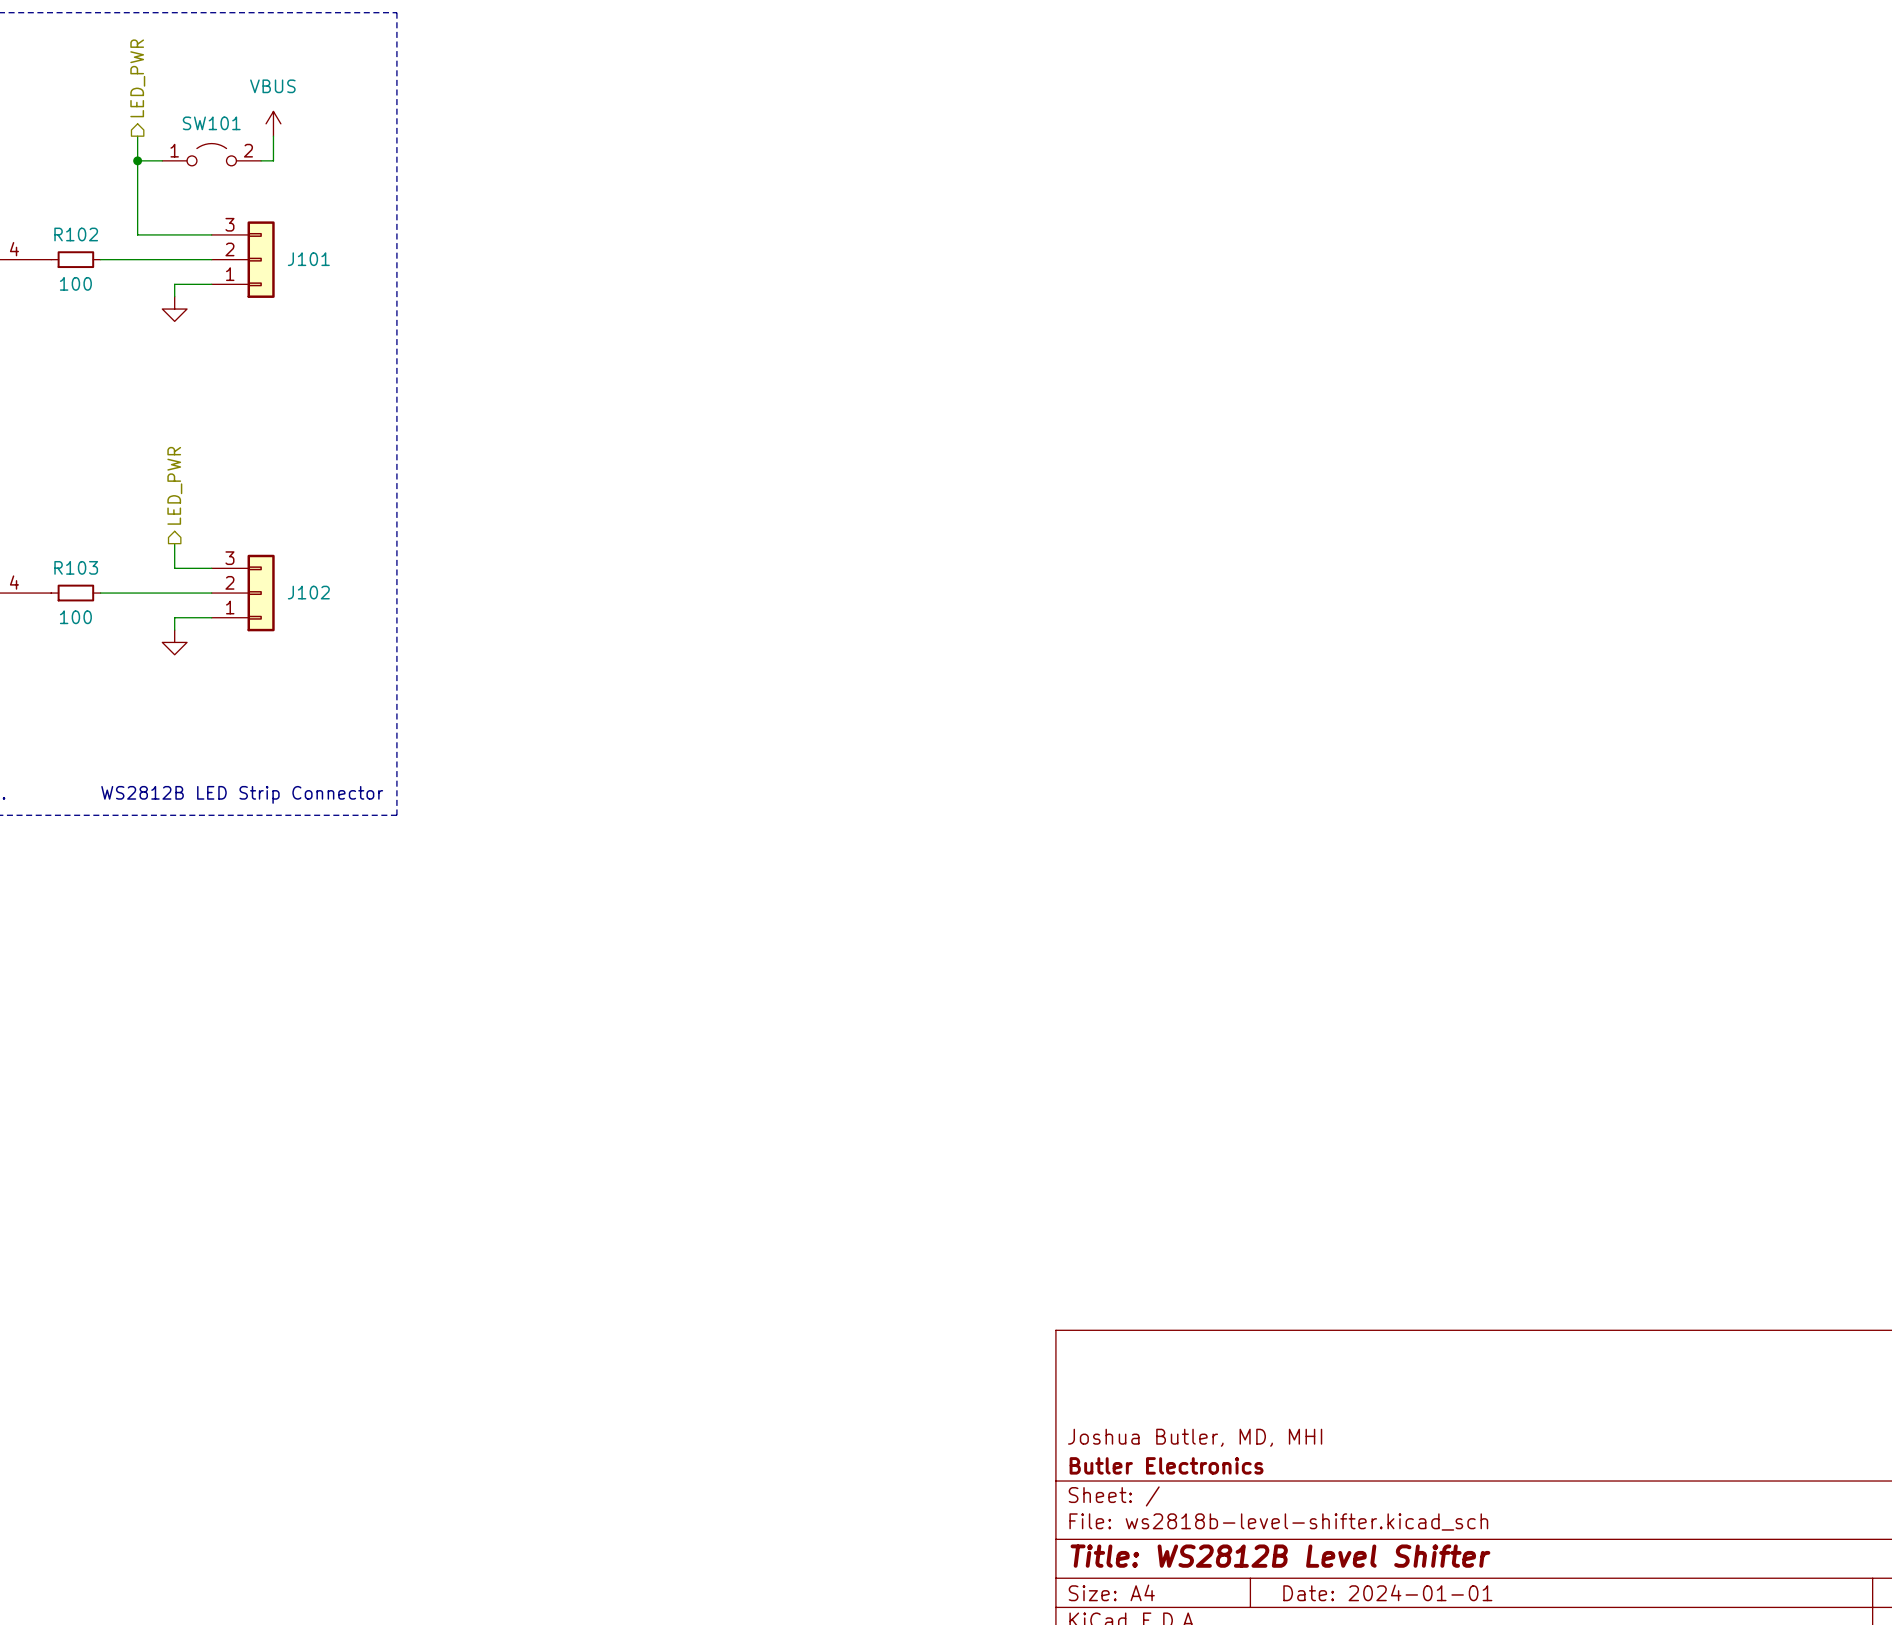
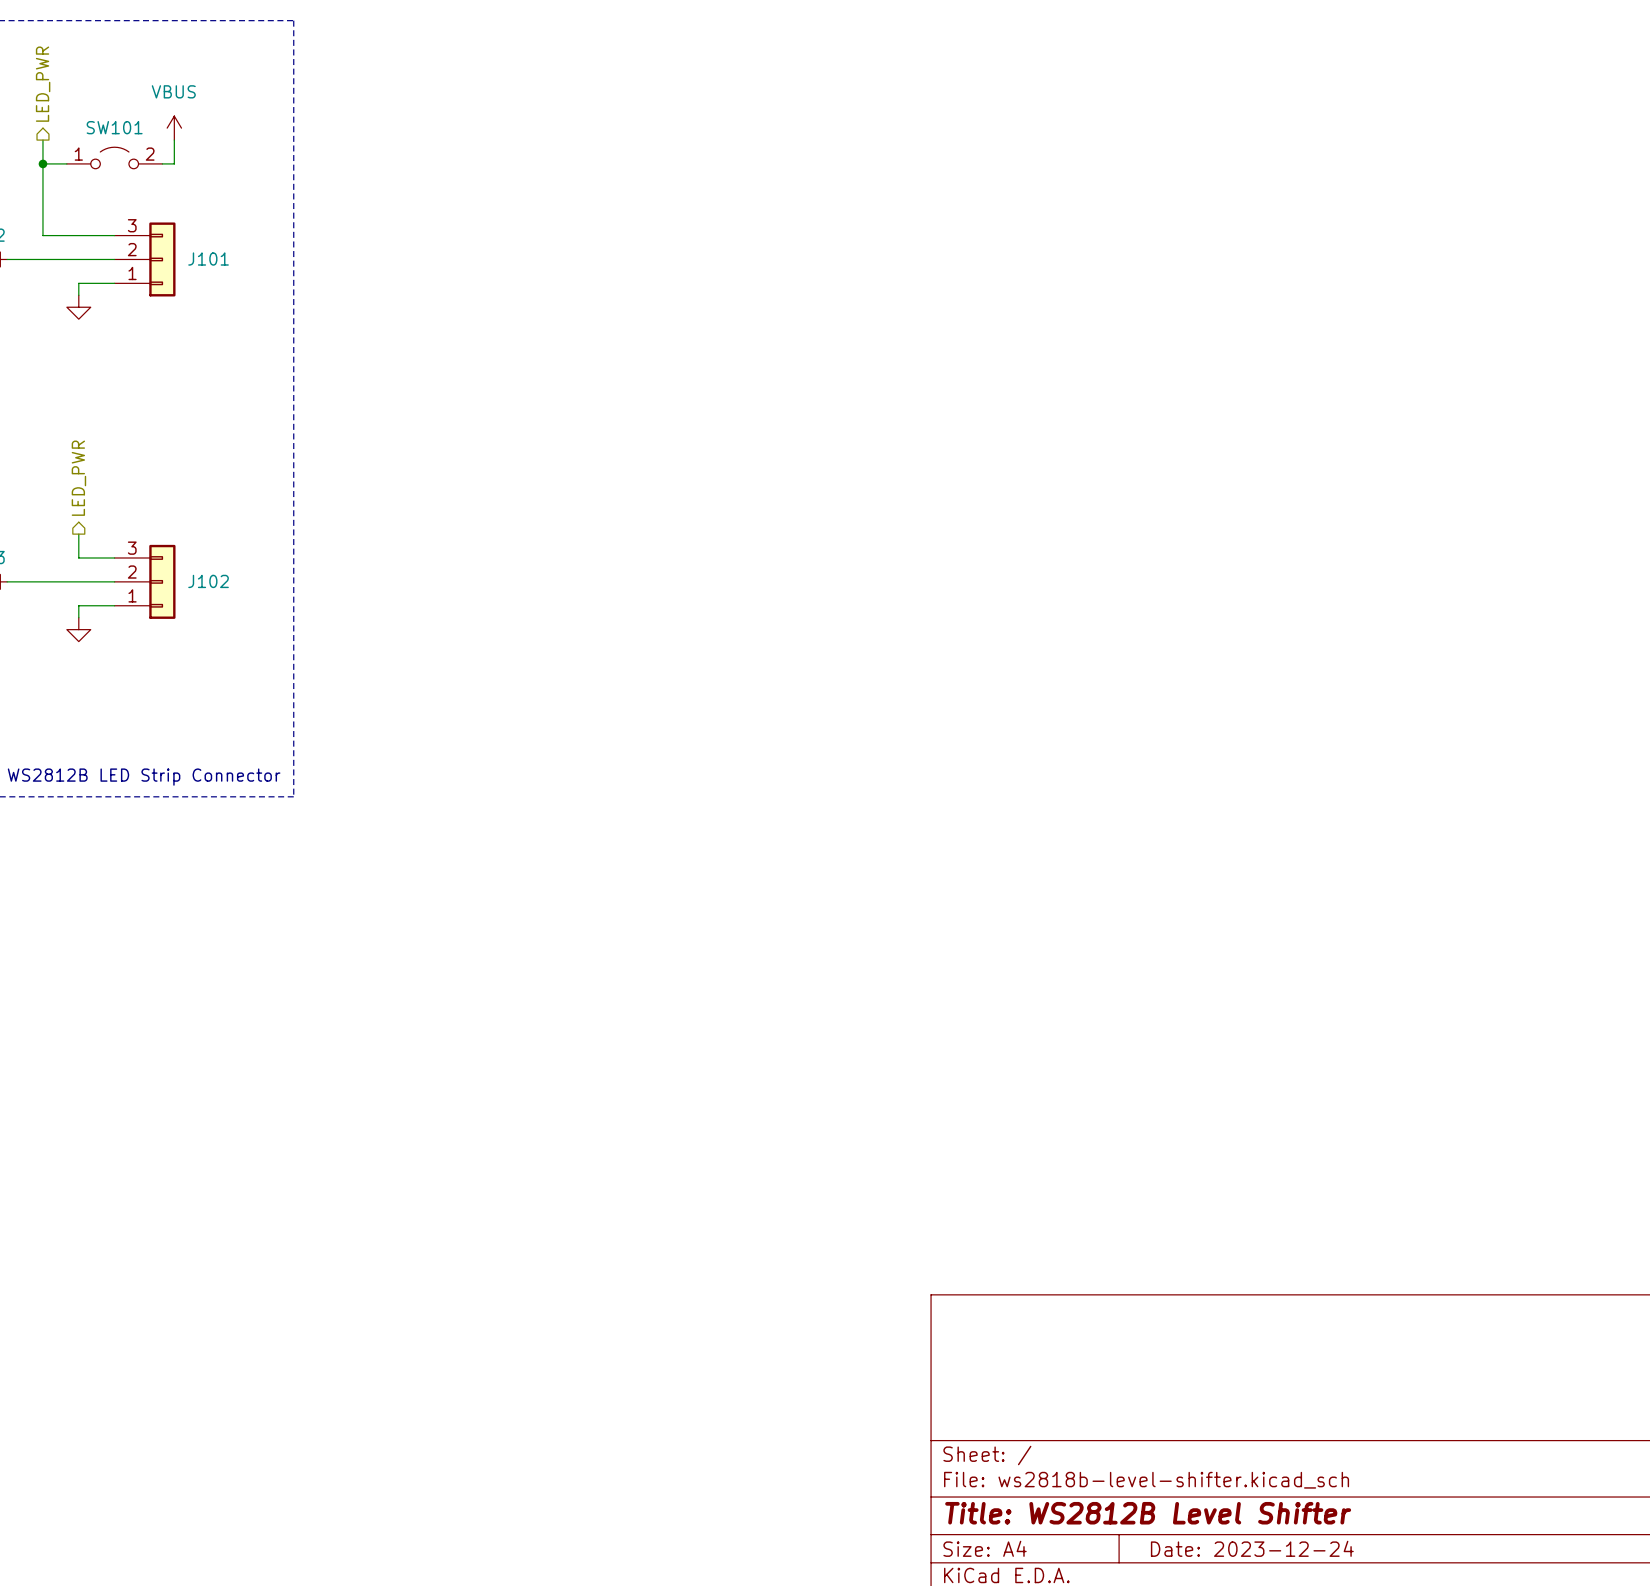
title block: Joshua Butler, MD, MHI (1195, 1437) -> none
title block: Butler Electronics (1166, 1465) -> none
title block: Date: 2024-01-01 (1387, 1592) -> Date: 2023-12-24 (1252, 1548)

